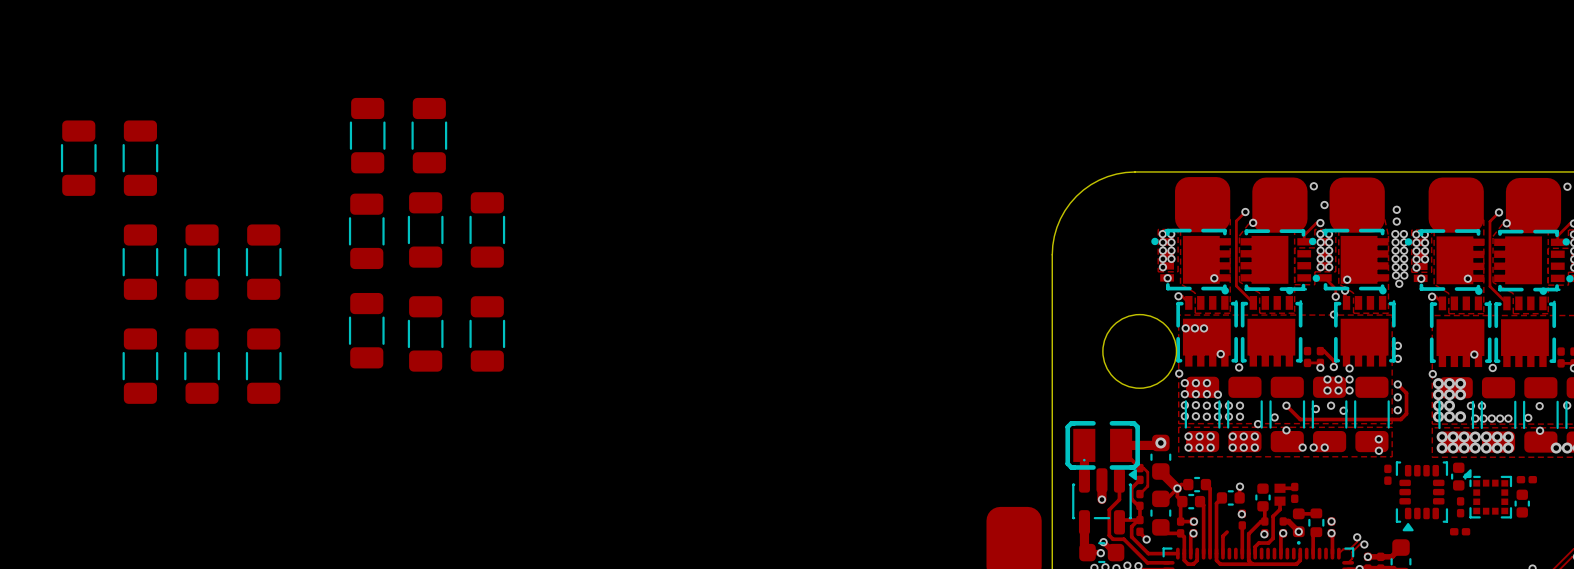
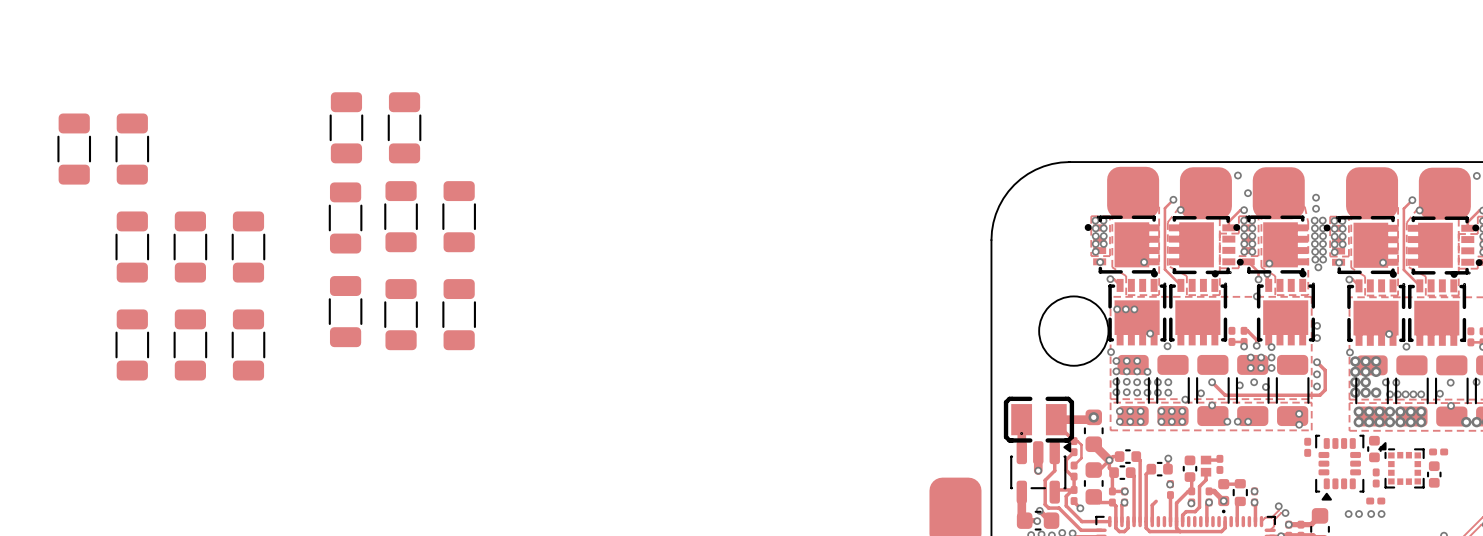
via: none -> (1348, 514)
via: none -> (1359, 514)
via: none -> (1371, 514)
via: none -> (1381, 514)

